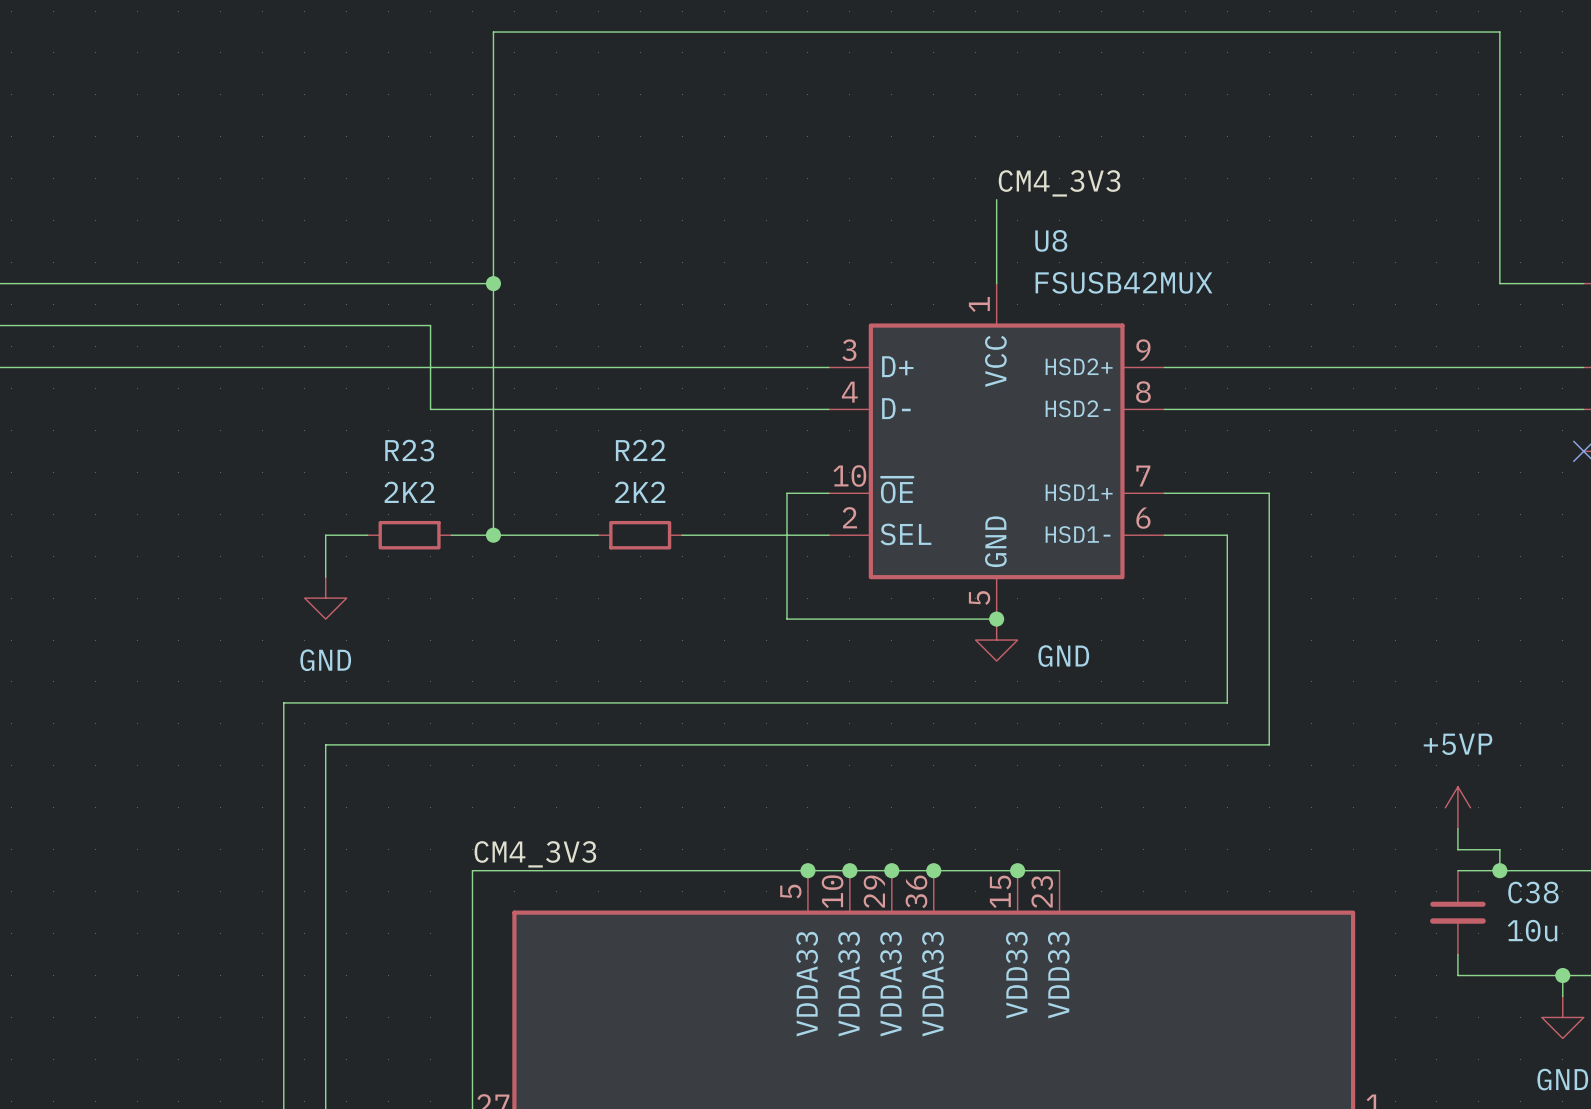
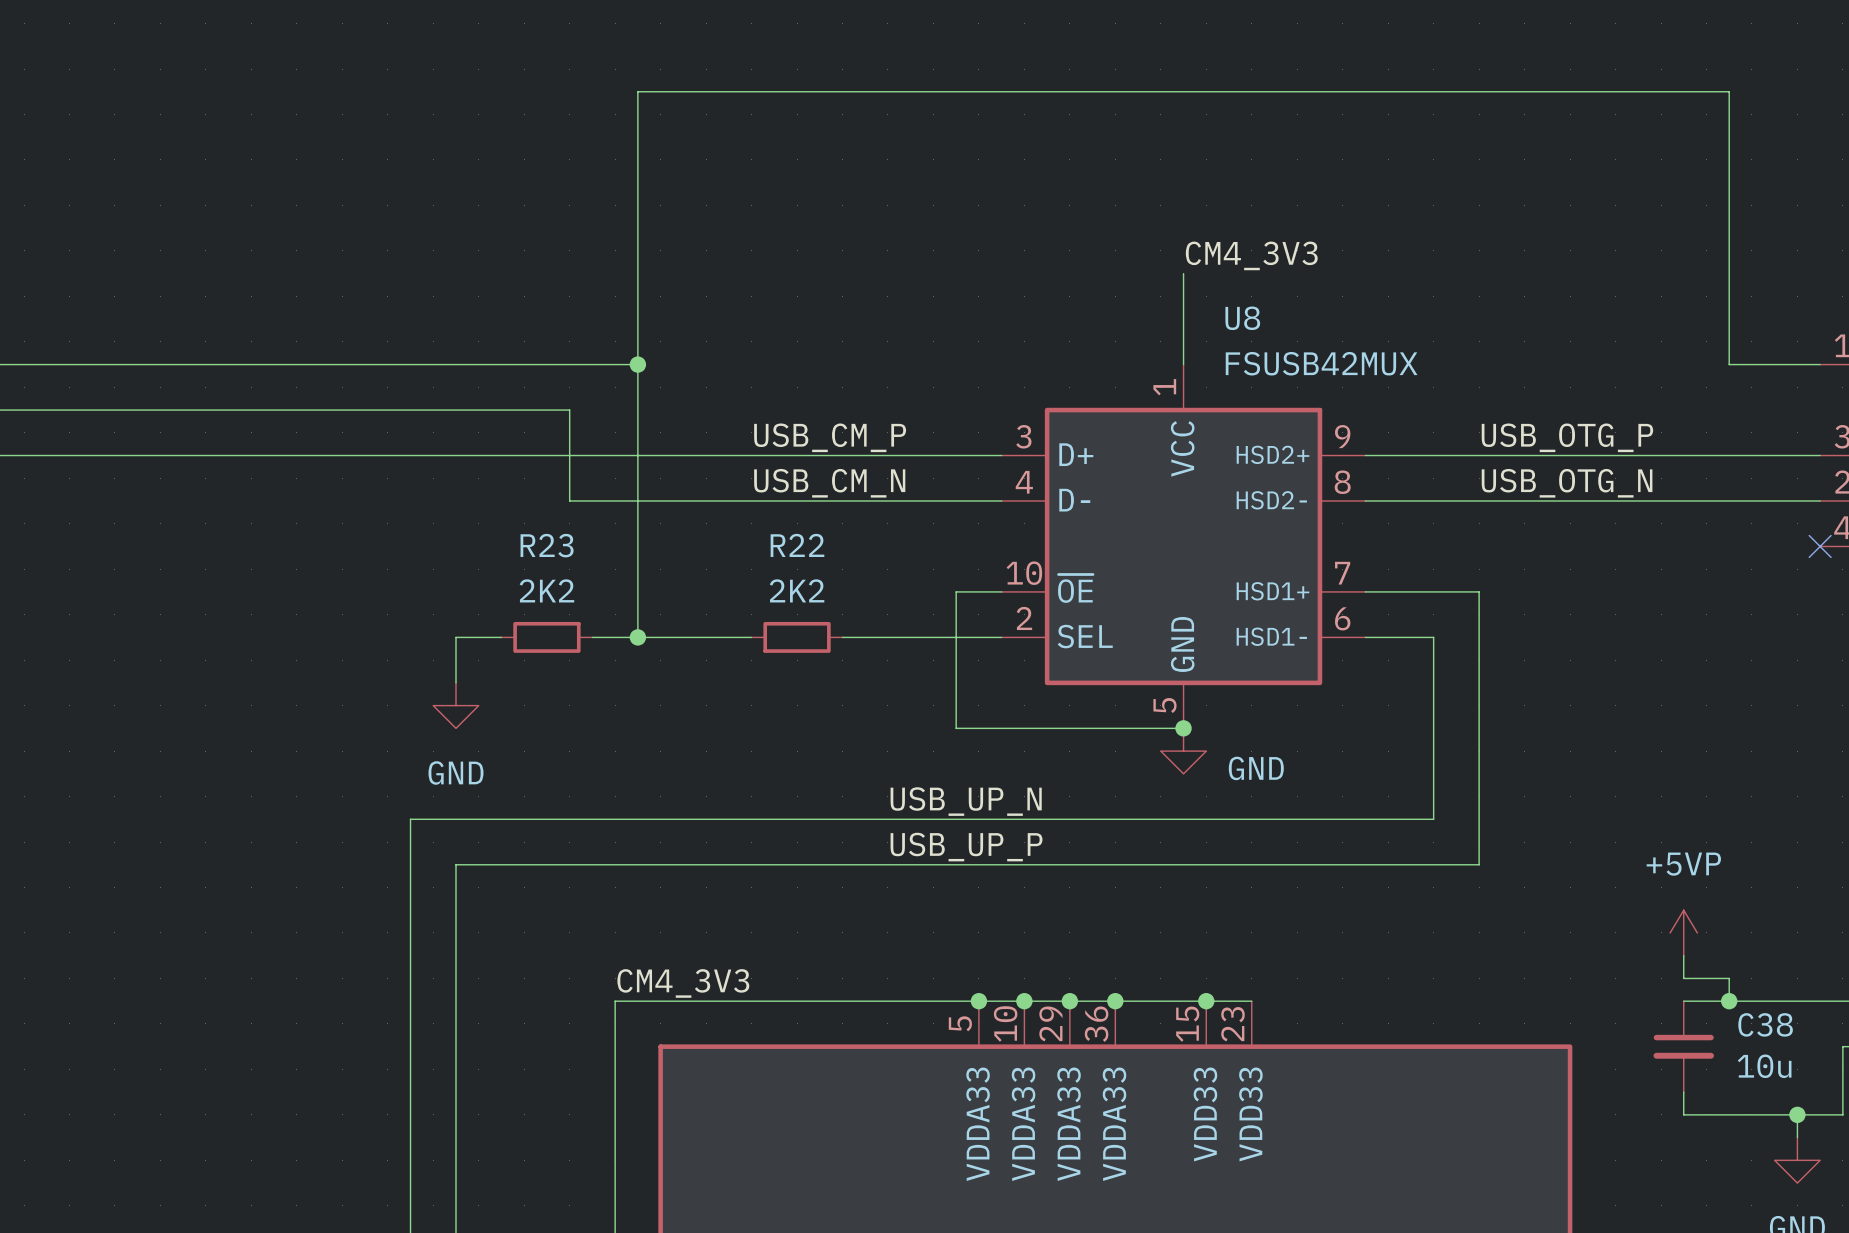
label: none -> USB_CM_P (830, 437)
label: none -> USB_OTG_P (1567, 437)
label: none -> USB_CM_N (829, 483)
label: none -> USB_OTG_N (1567, 483)
label: none -> USB_UP_N (966, 801)
label: none -> USB_UP_P (966, 847)

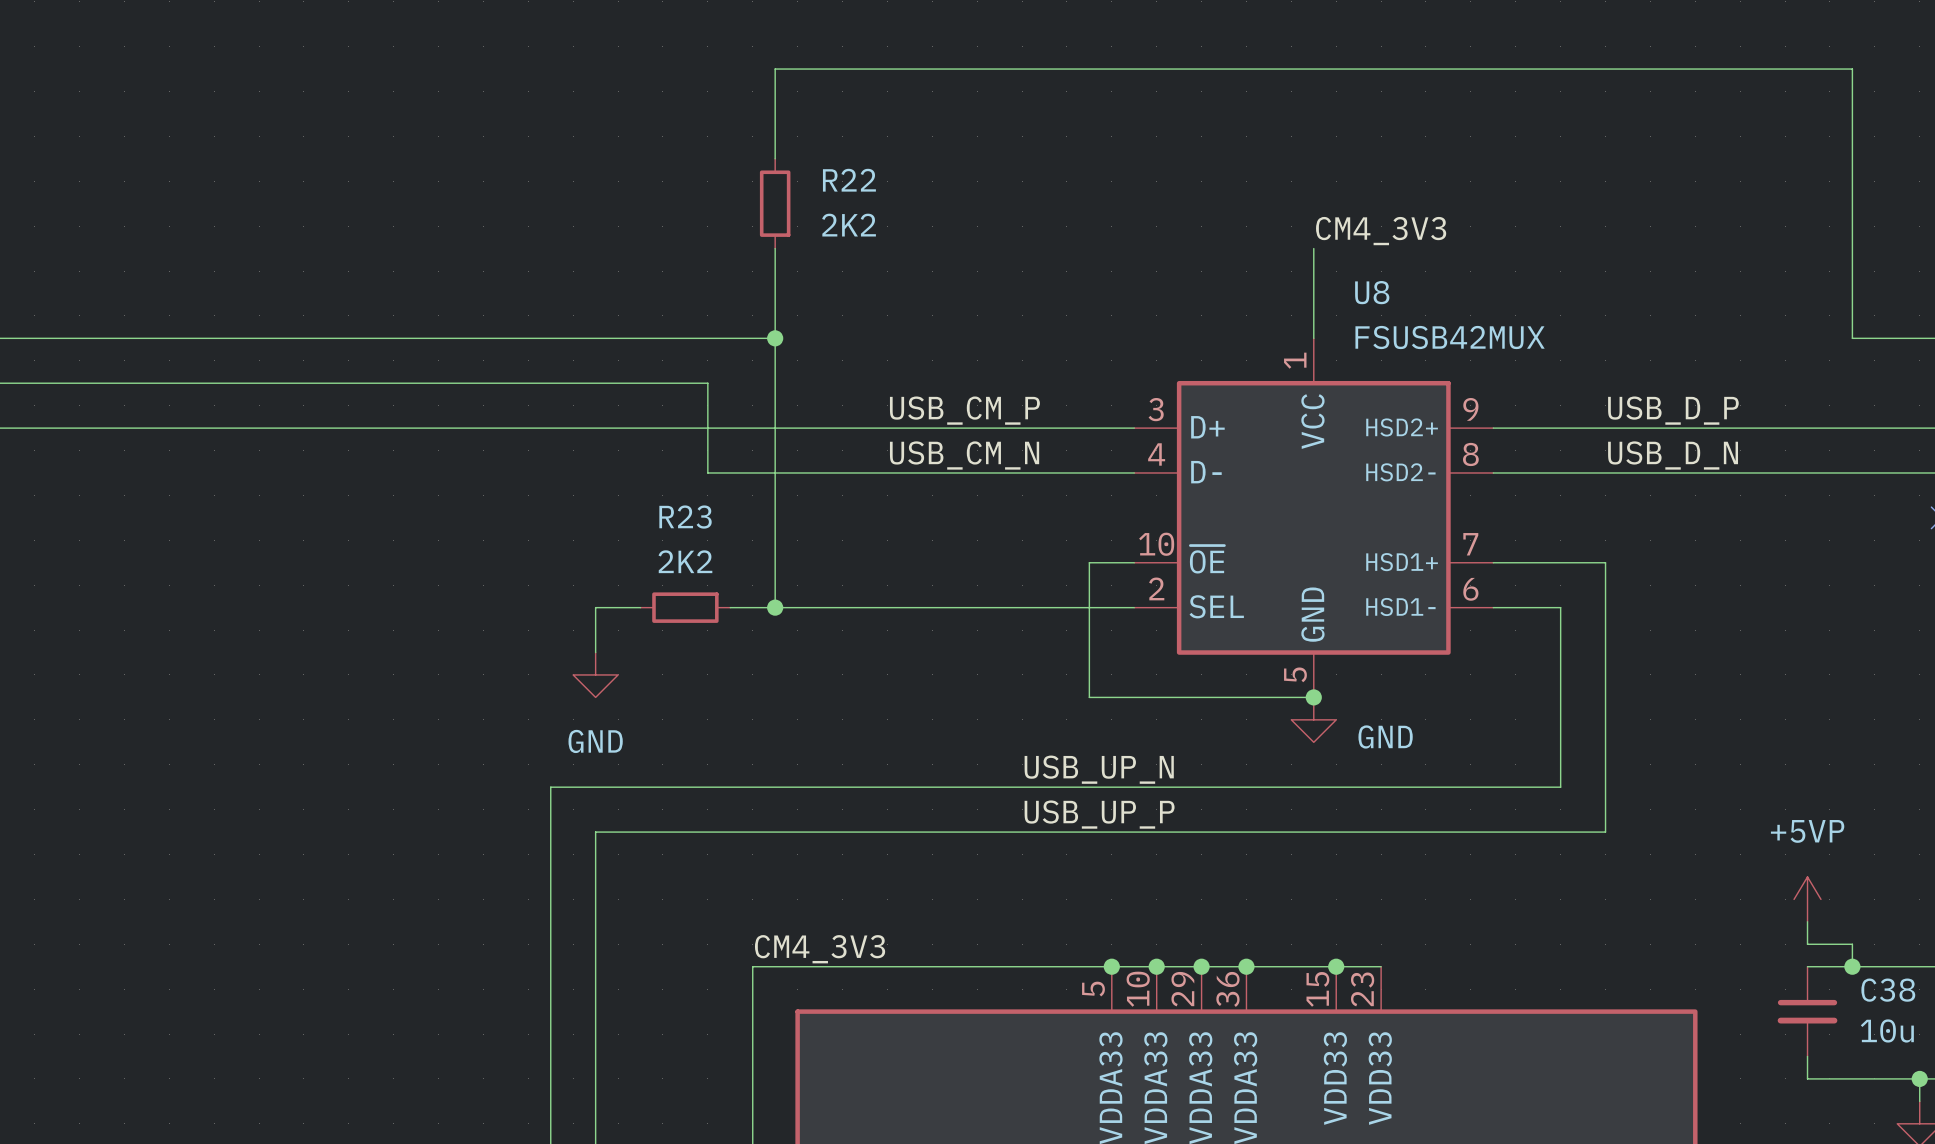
wire: (637, 182) (637, 273) -> none
label: USB_OTG_P (1567, 437) -> USB_D_P (1673, 410)
label: USB_OTG_N (1567, 483) -> USB_D_N (1673, 455)
R22 value position: 2K2 (797, 590) -> 2K2 (849, 225)
wire: none -> (887, 607) (977, 607)
R22 rotation: 0° (797, 637) -> 90° clockwise (775, 203)
R22 position: (797, 637) -> (775, 203)

